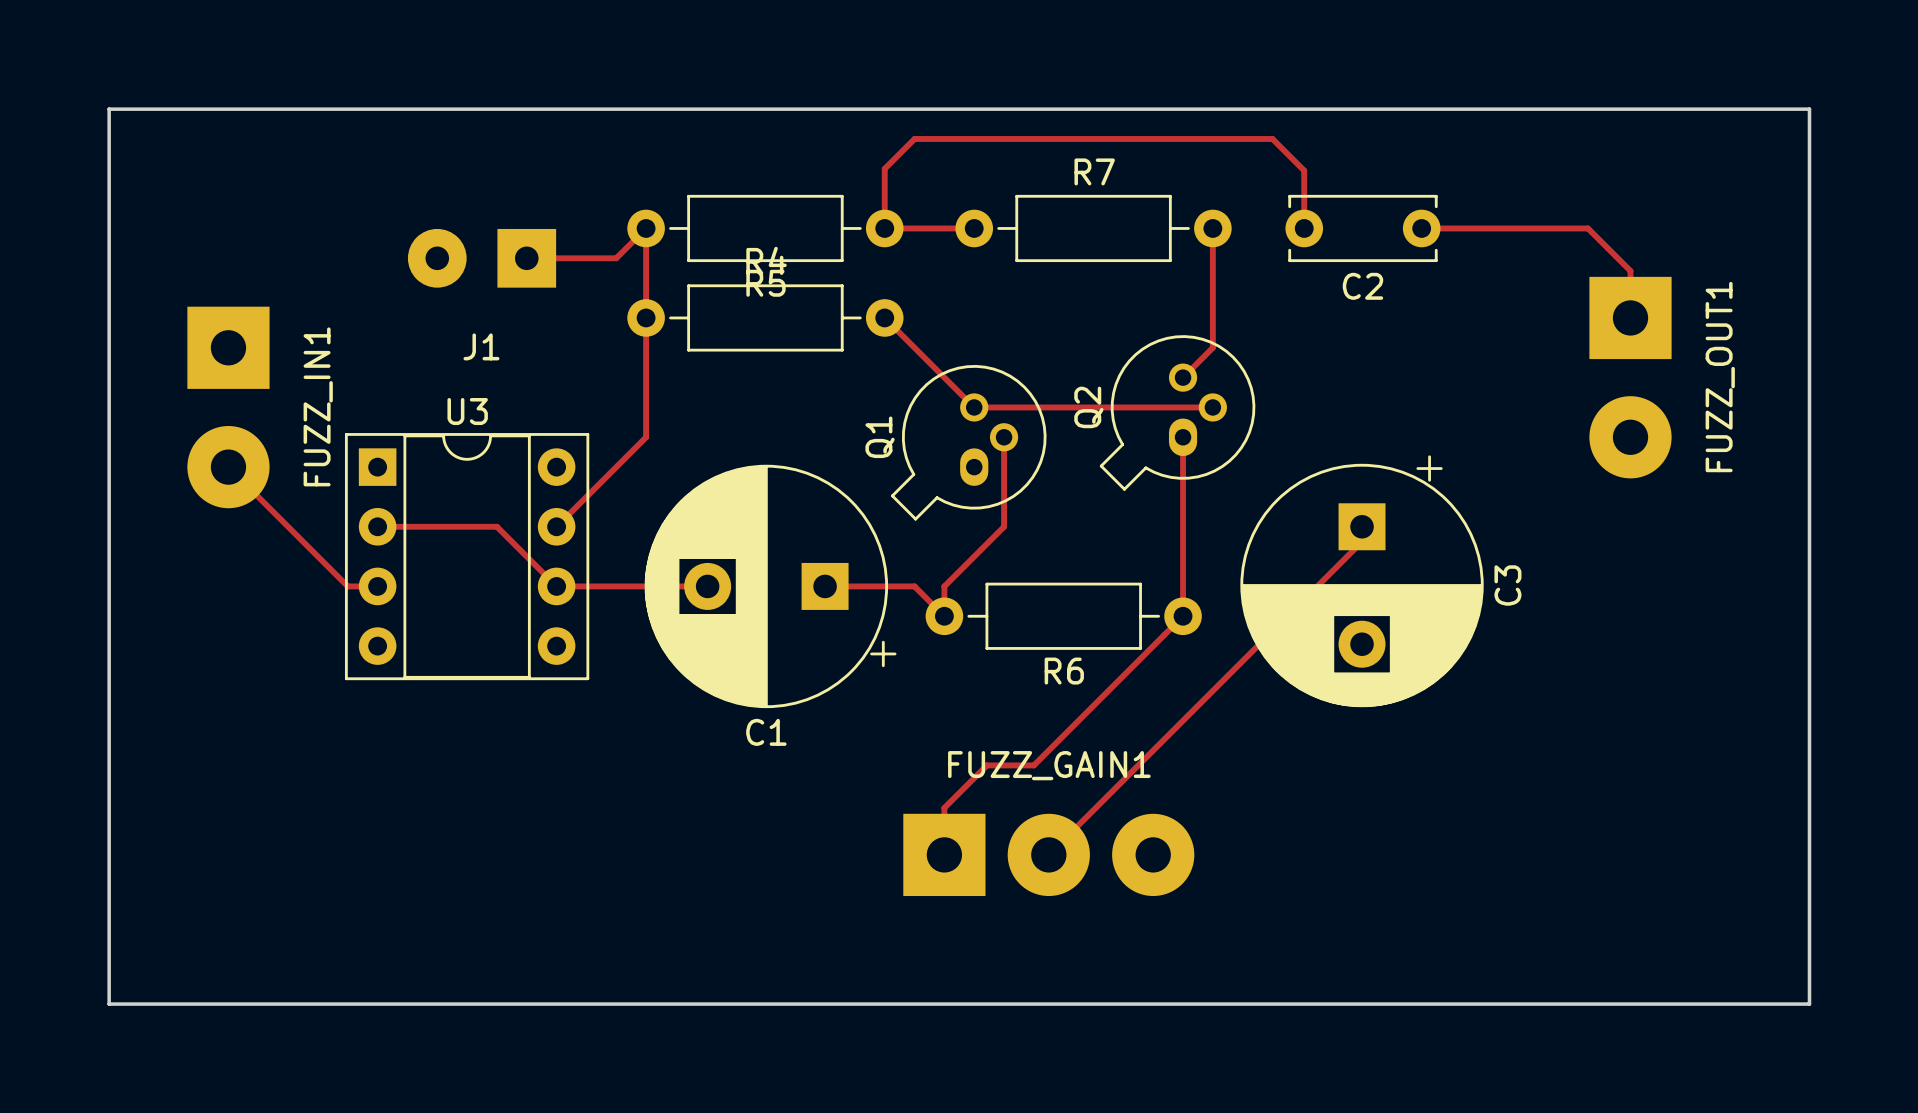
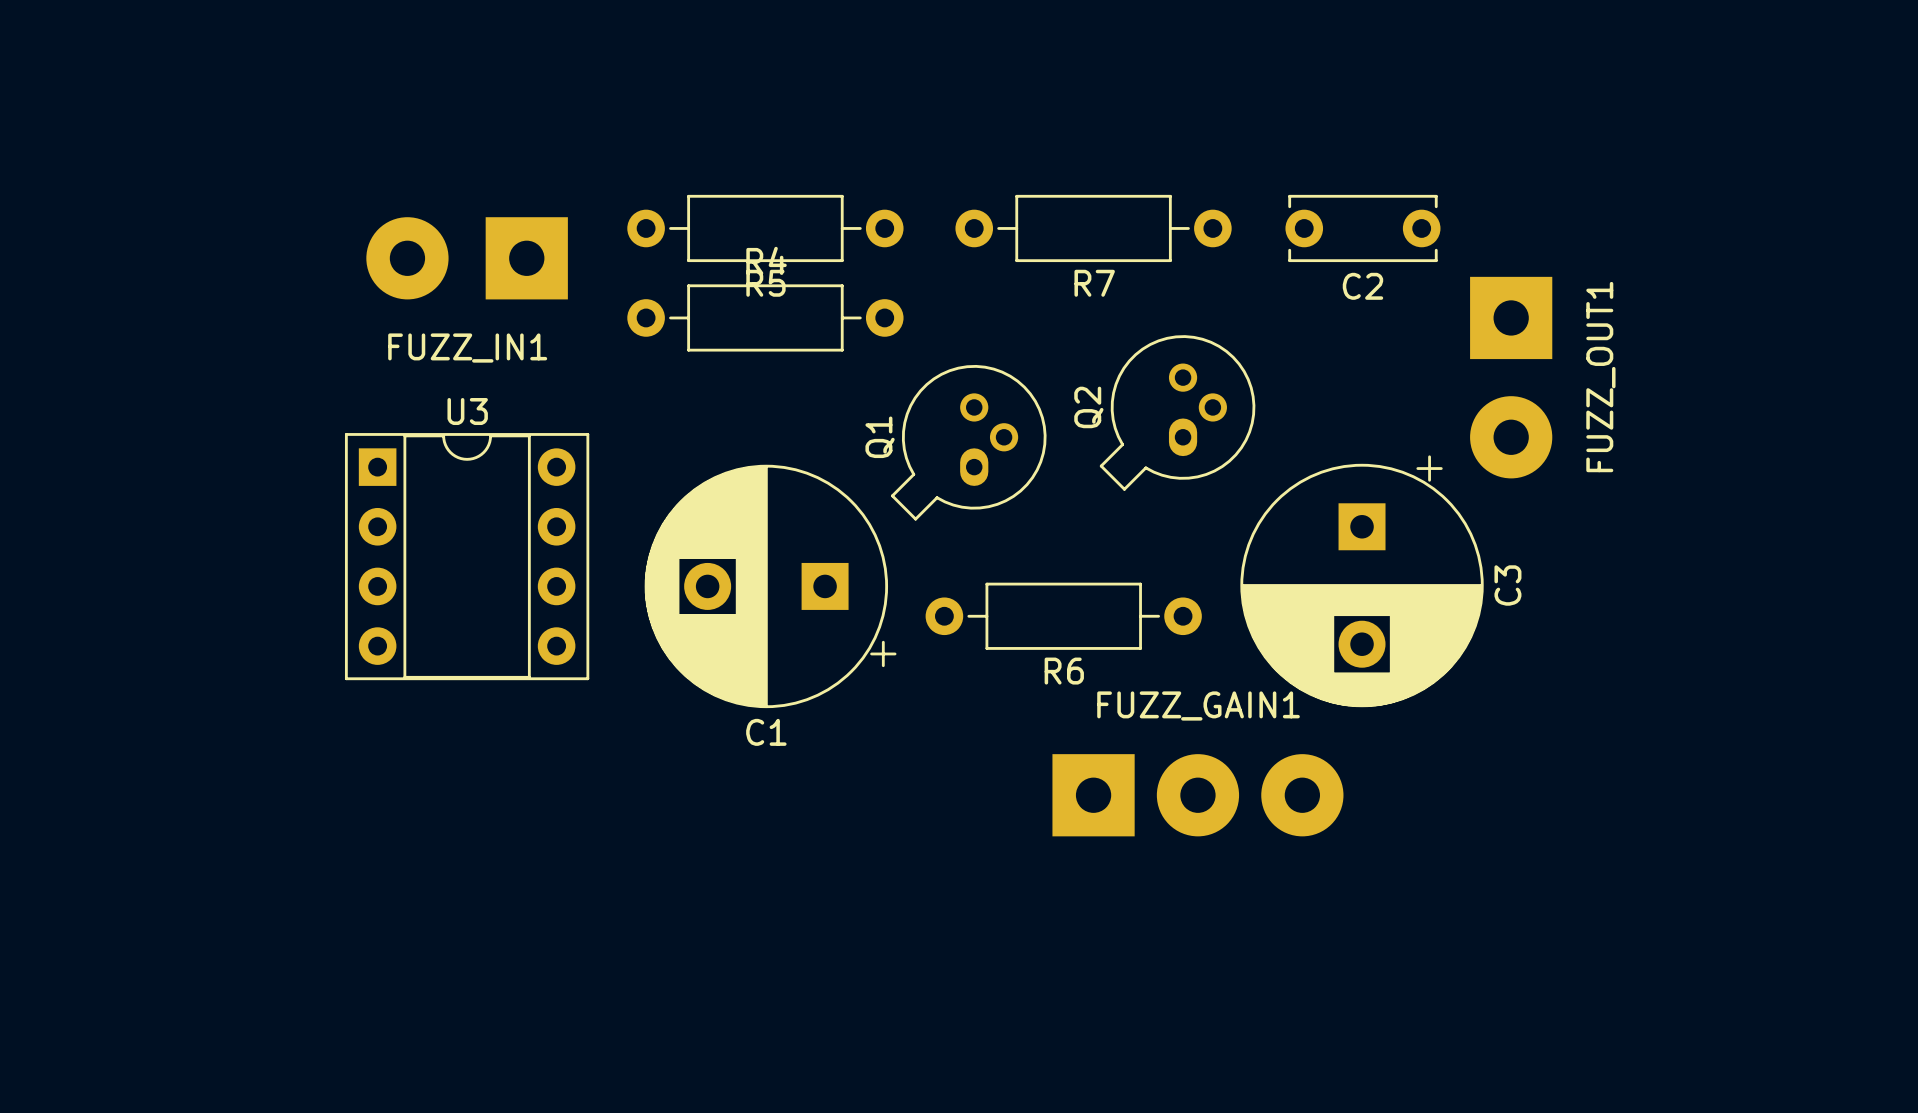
board edge: (109, 109) (1809, 109) (1809, 1004) (109, 1004) (109, 109) -> none
R7 name position: R7 (1094, 171) -> R7 (1094, 283)
track: (974, 228) (884, 228) (884, 168) (914, 138) (1272, 138) (1304, 170) (1304, 228) -> none
track: (1212, 228) (1212, 347) (1183, 377) -> none
track: (1421, 228) (1587, 228) (1630, 270) (1630, 317) -> none
J1: (482, 258) -> none
track: (526, 258) (616, 258) (646, 228) (646, 437) (556, 526) -> none
track: (884, 317) (974, 407) (1212, 407) -> none
FUZZ_OUT1 position: (1630, 377) -> (1511, 377)
FUZZ_IN1 rotation: 0° (228, 407) -> 90° clockwise (467, 258)
FUZZ_IN1 position: (228, 407) -> (467, 258)
track: (1004, 437) (1004, 526) (944, 586) (944, 616) (914, 586) (825, 586) -> none
track: (1183, 437) (1183, 616) (1033, 765) (986, 765) (944, 807) (944, 854) -> none
track: (228, 467) (347, 586) (377, 586) -> none
track: (377, 526) (496, 526) (556, 586) (707, 586) -> none
track: (1362, 526) (1362, 541) (1048, 854) -> none
FUZZ_GAIN1 position: (1048, 854) -> (1197, 795)

